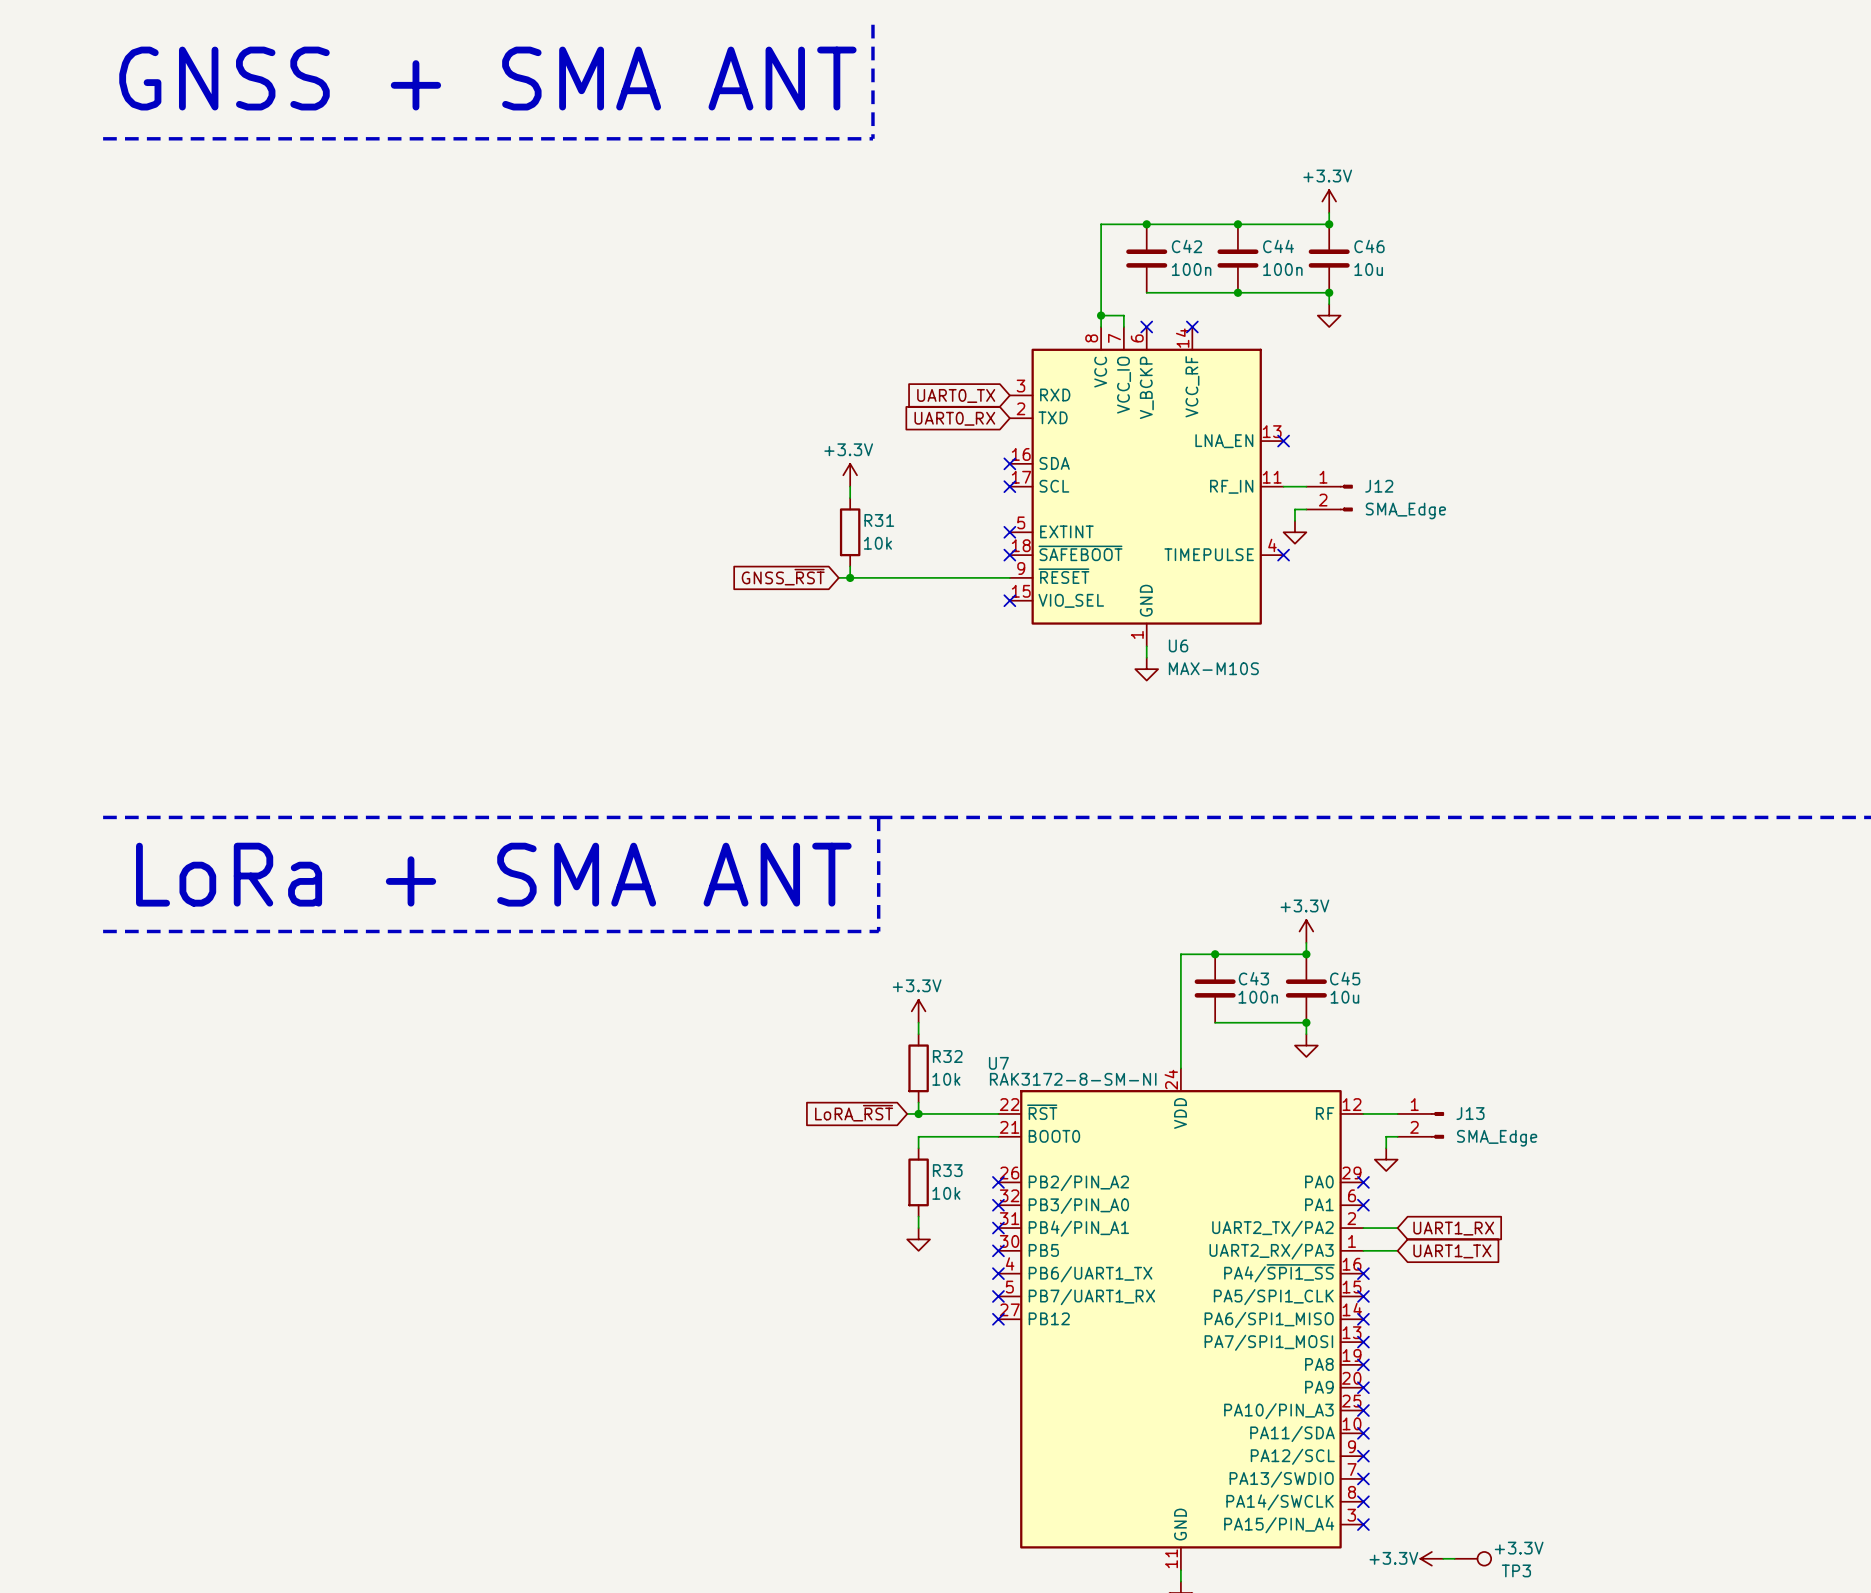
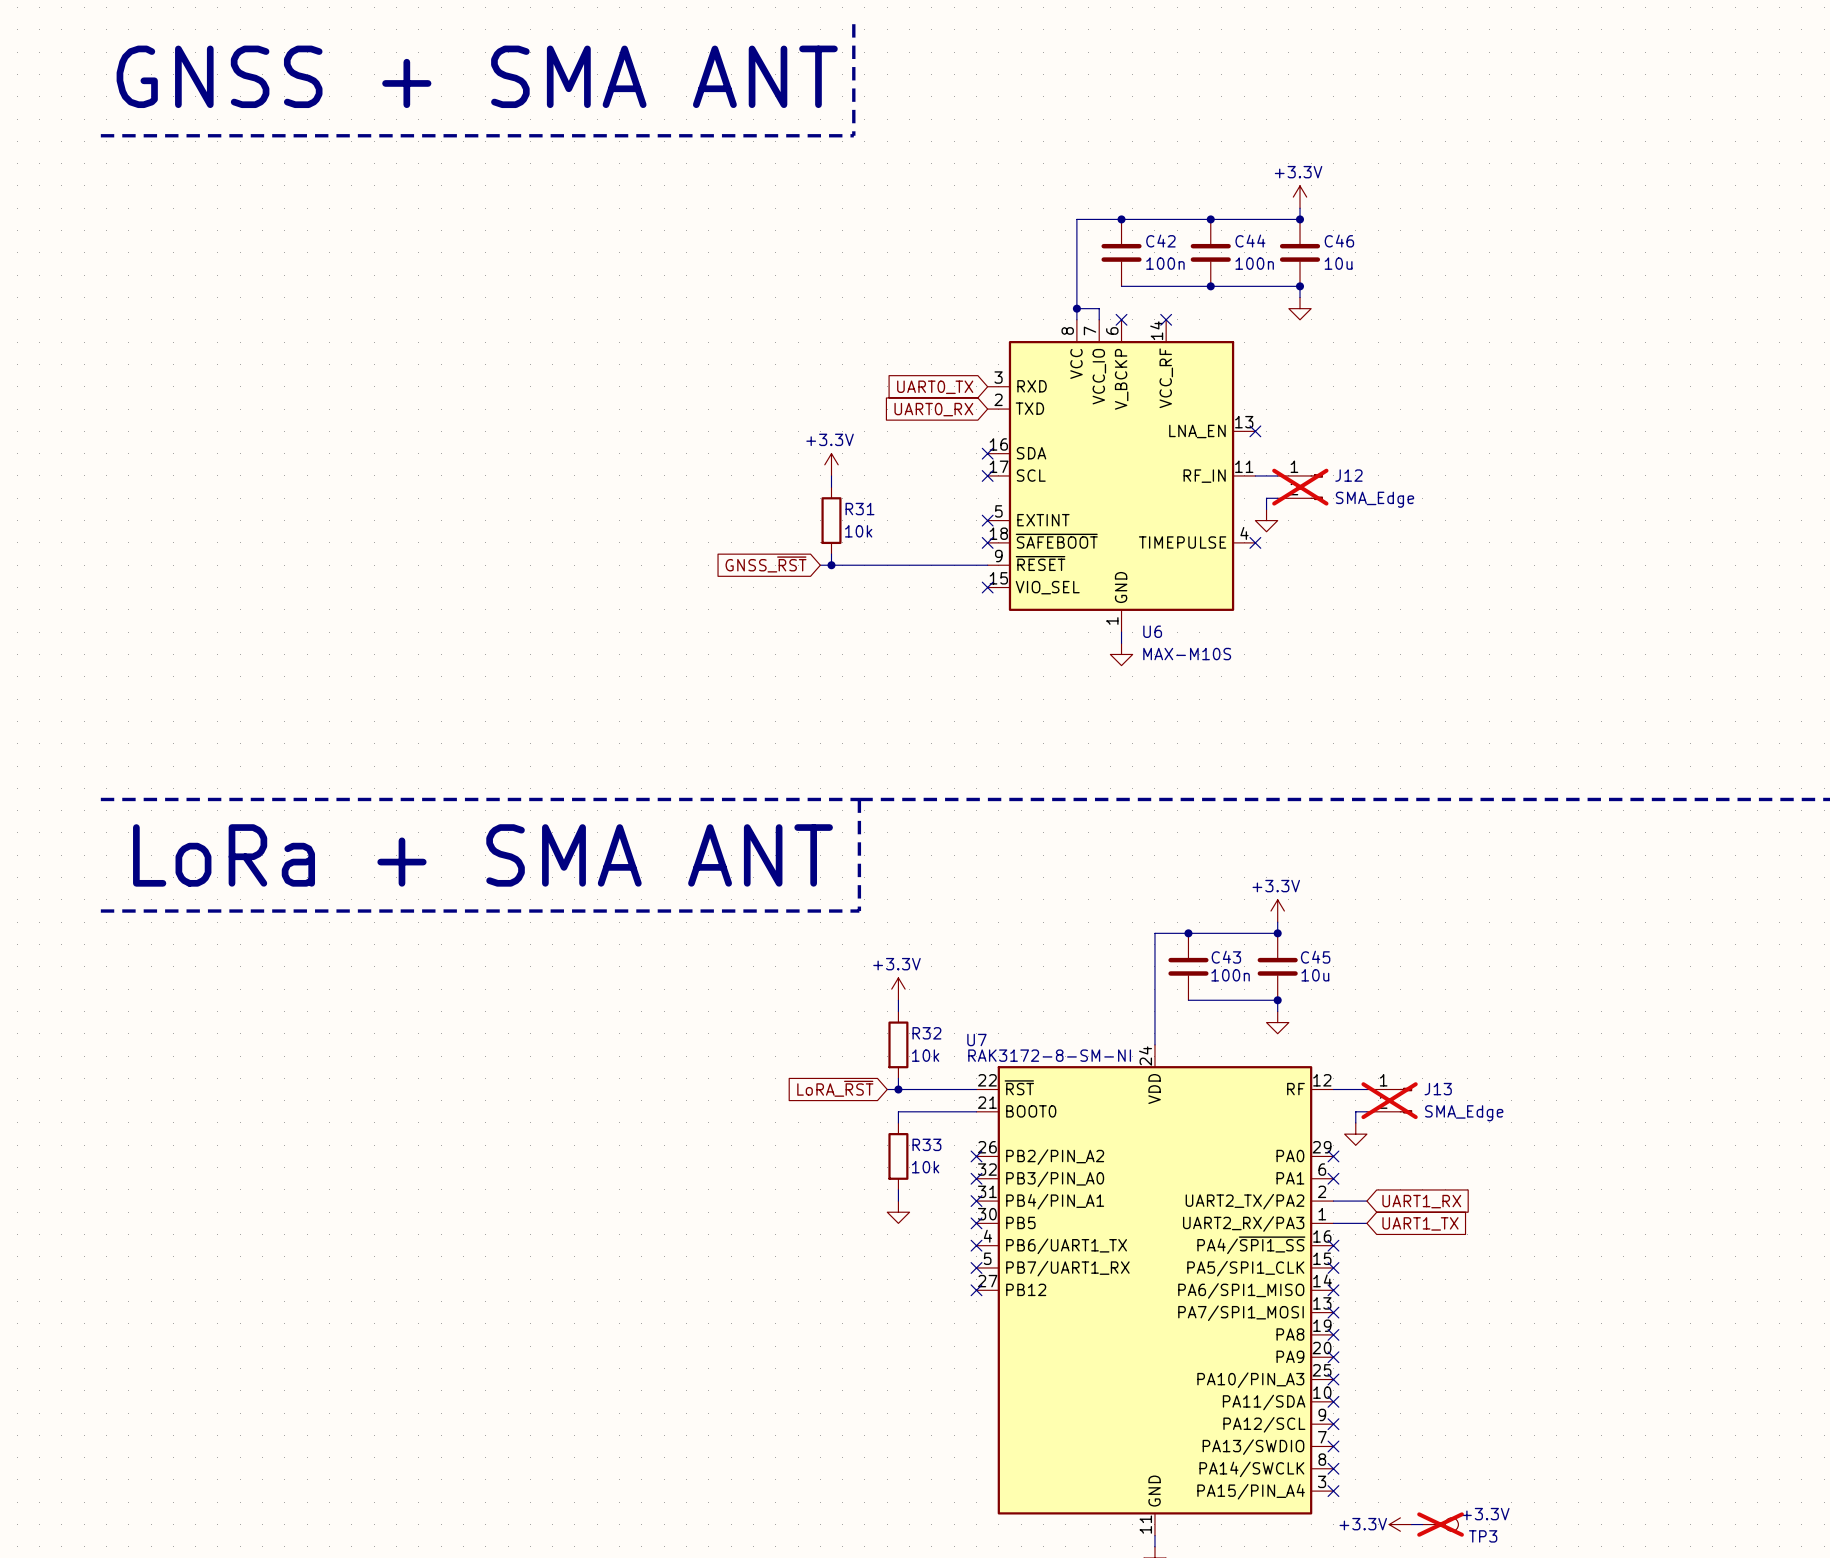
J12 do-not-place cross: none -> (1300, 487)
J13 do-not-place cross: none -> (1389, 1100)
TP3 do-not-place cross: none -> (1440, 1524)

